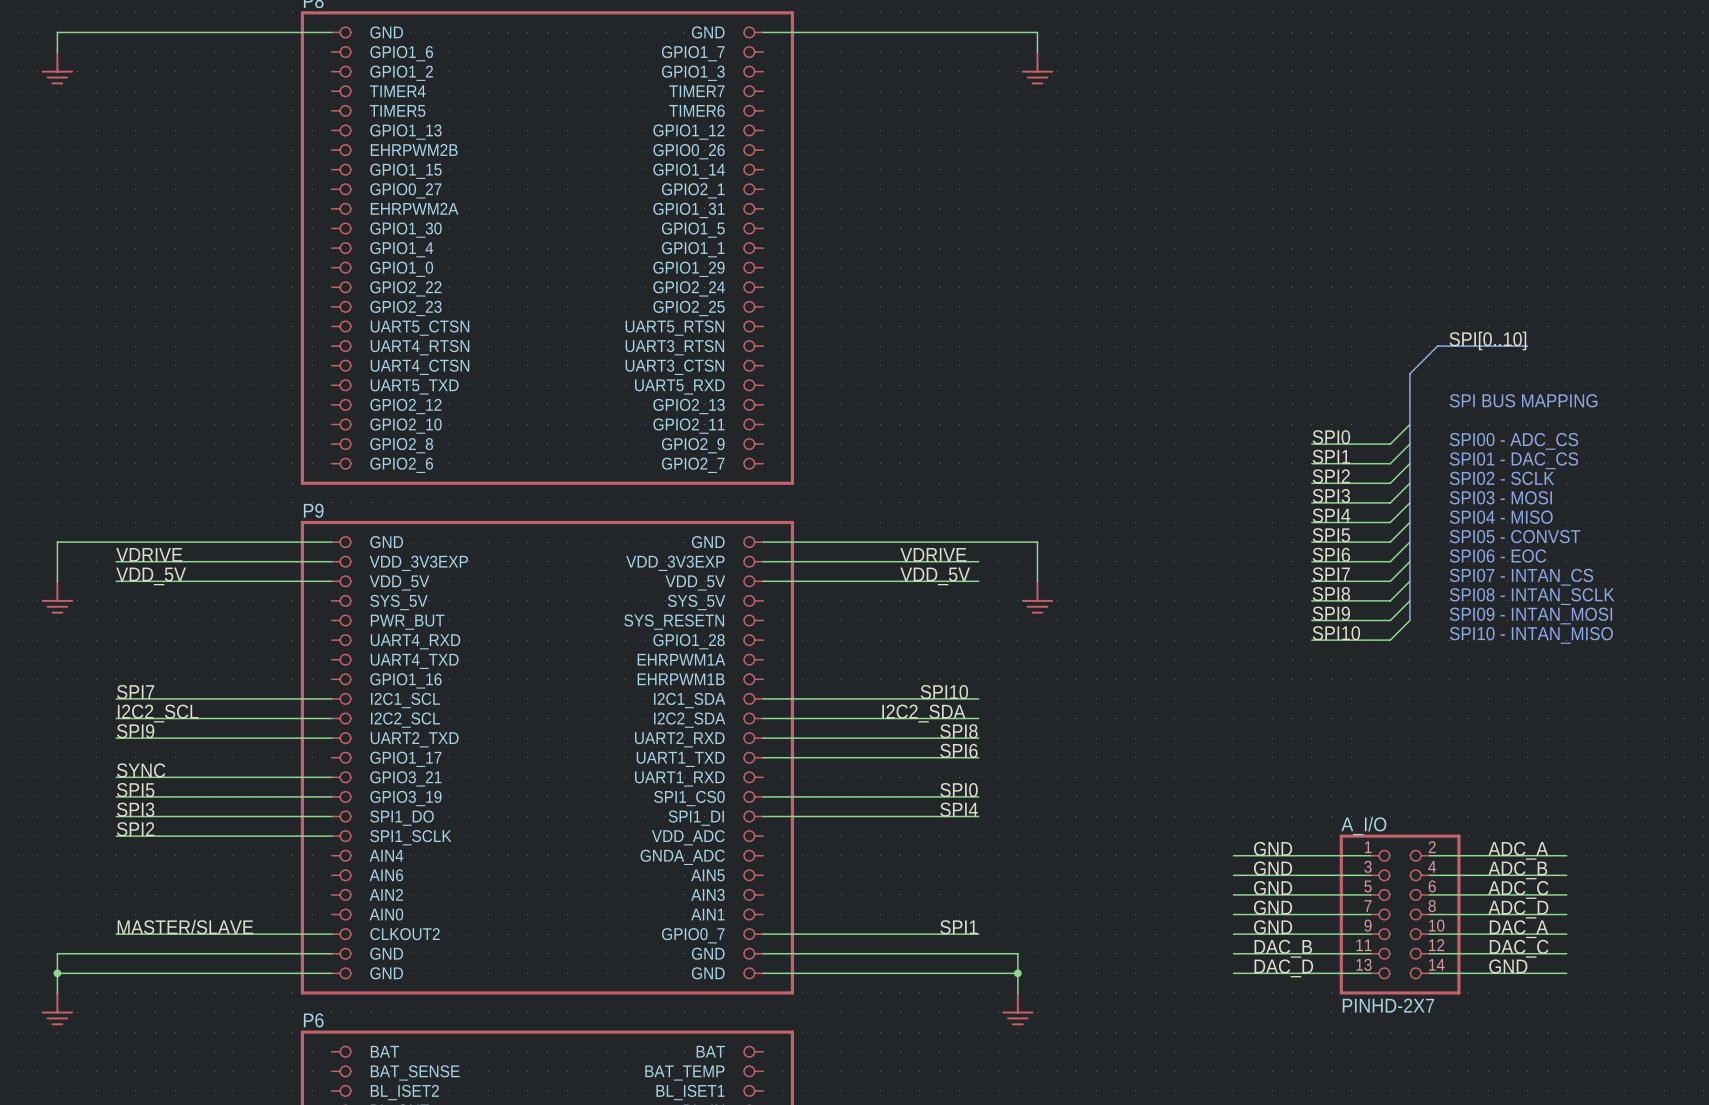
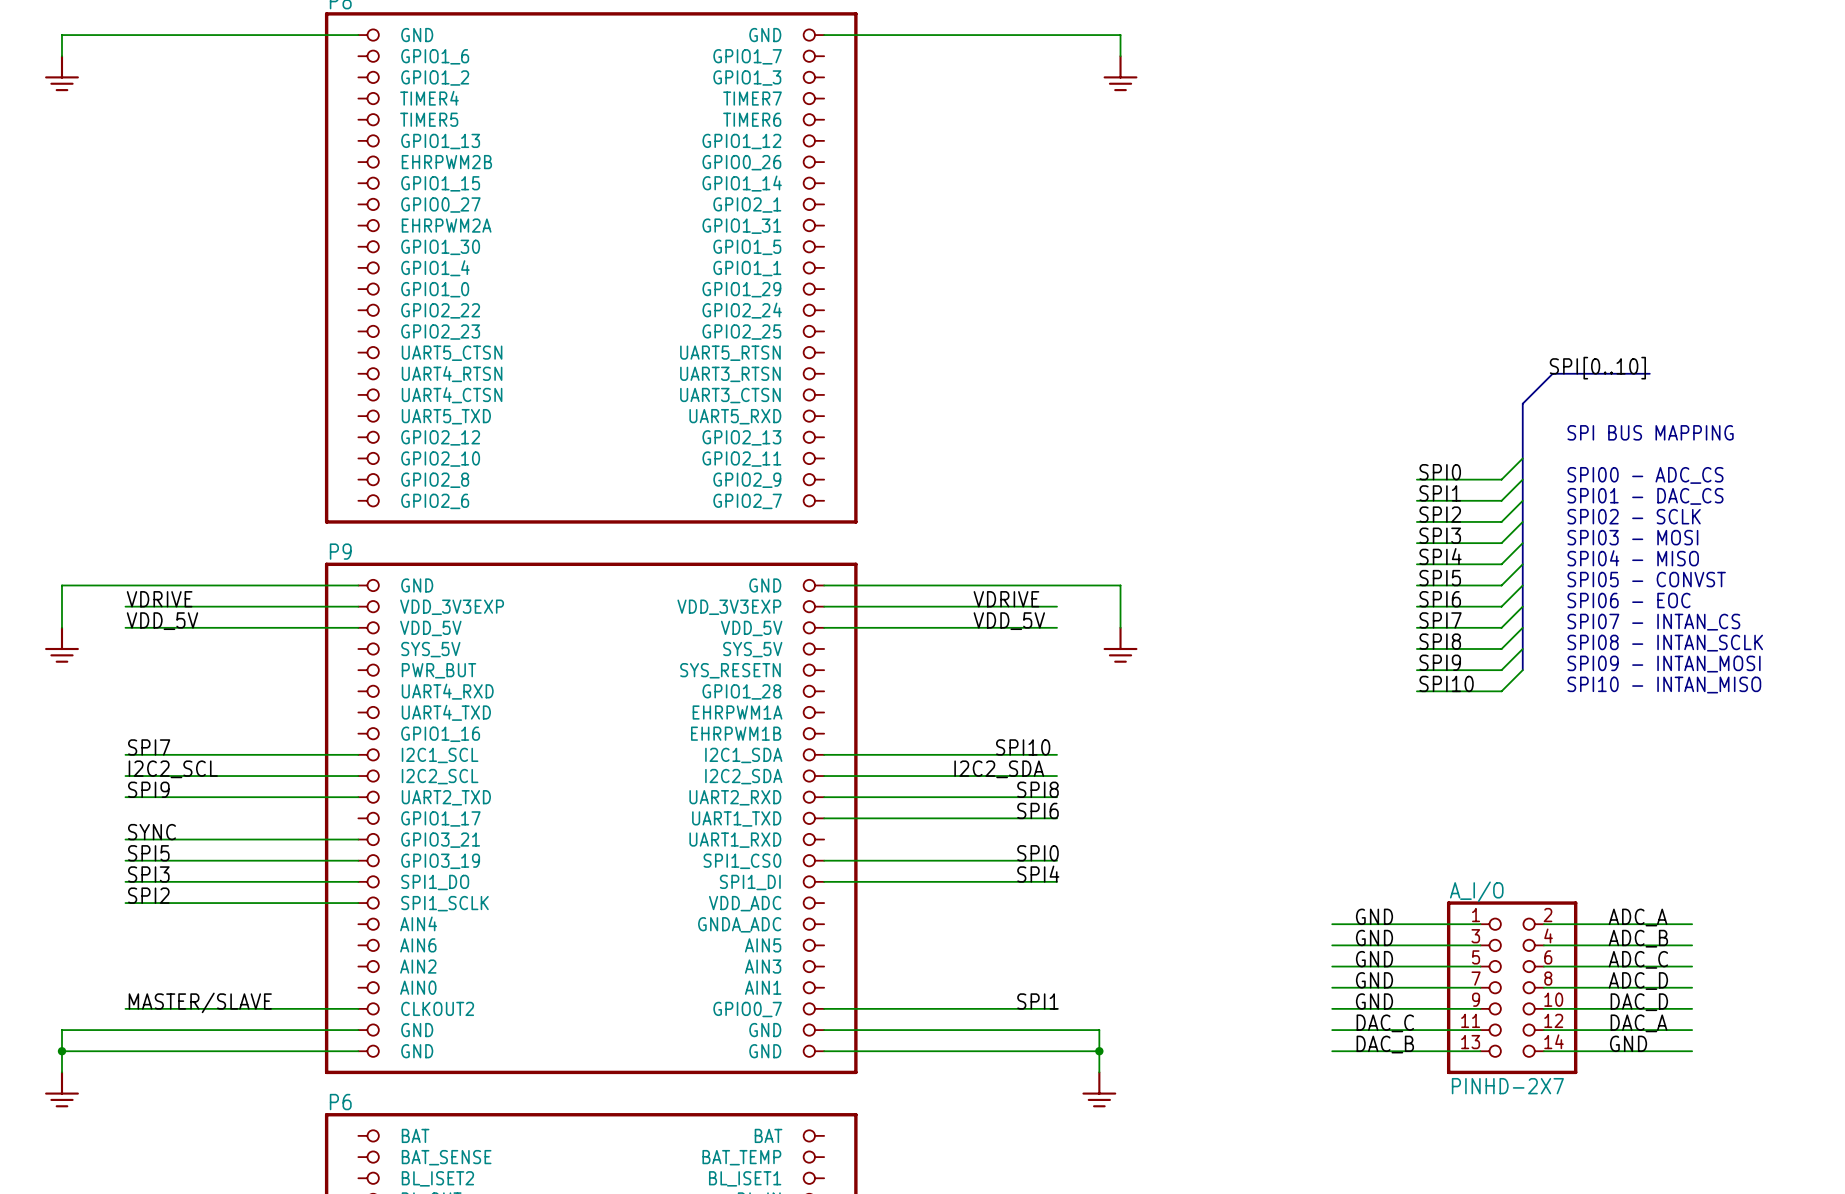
label: DAC_A (1518, 929) -> DAC_D (1639, 1002)
label: DAC_B (1283, 948) -> DAC_C (1385, 1023)
label: DAC_C (1519, 948) -> DAC_A (1639, 1023)
label: DAC_D (1283, 968) -> DAC_B (1385, 1044)

